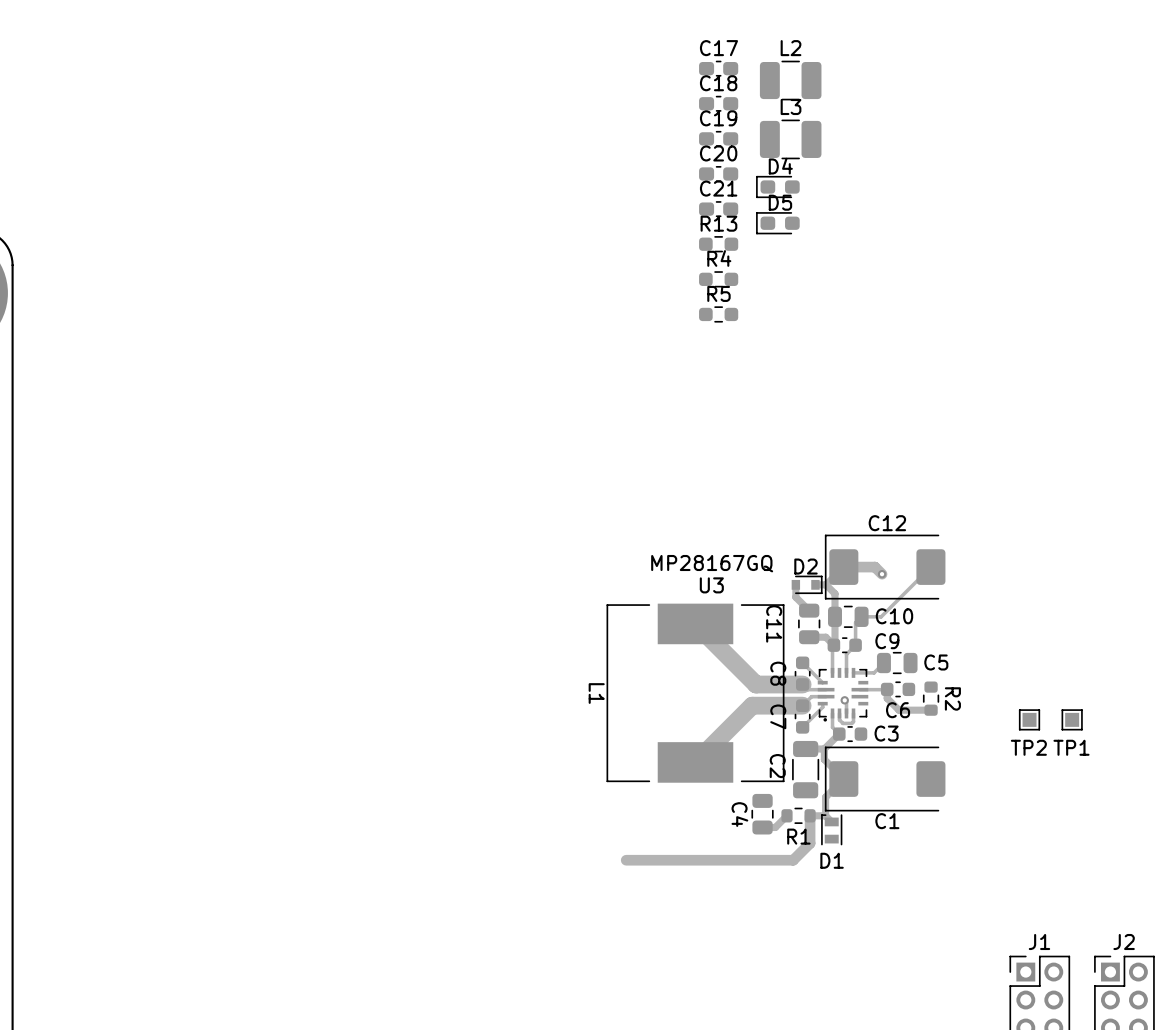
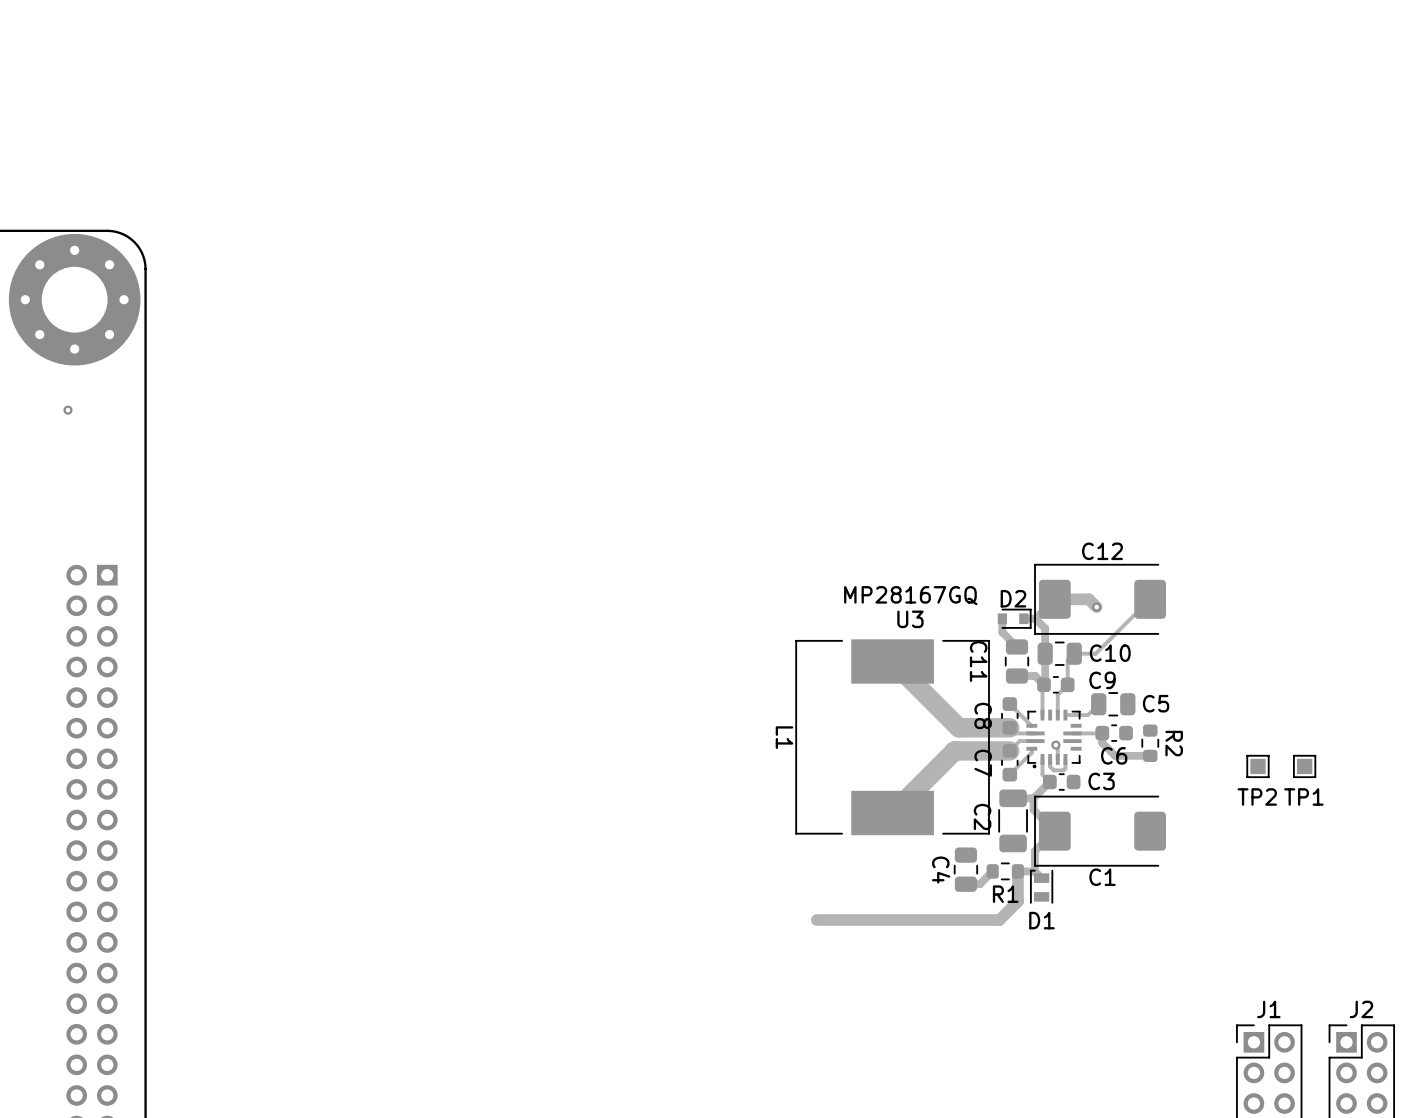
C17: (718, 68) -> none
L2: (790, 80) -> none
C18: (718, 103) -> none
C19: (718, 138) -> none
L3: (790, 139) -> none
C20: (718, 173) -> none
D4: (777, 187) -> none
C21: (718, 209) -> none
D5: (777, 223) -> none
R13: (718, 244) -> none
R4: (718, 279) -> none
R5: (718, 314) -> none

